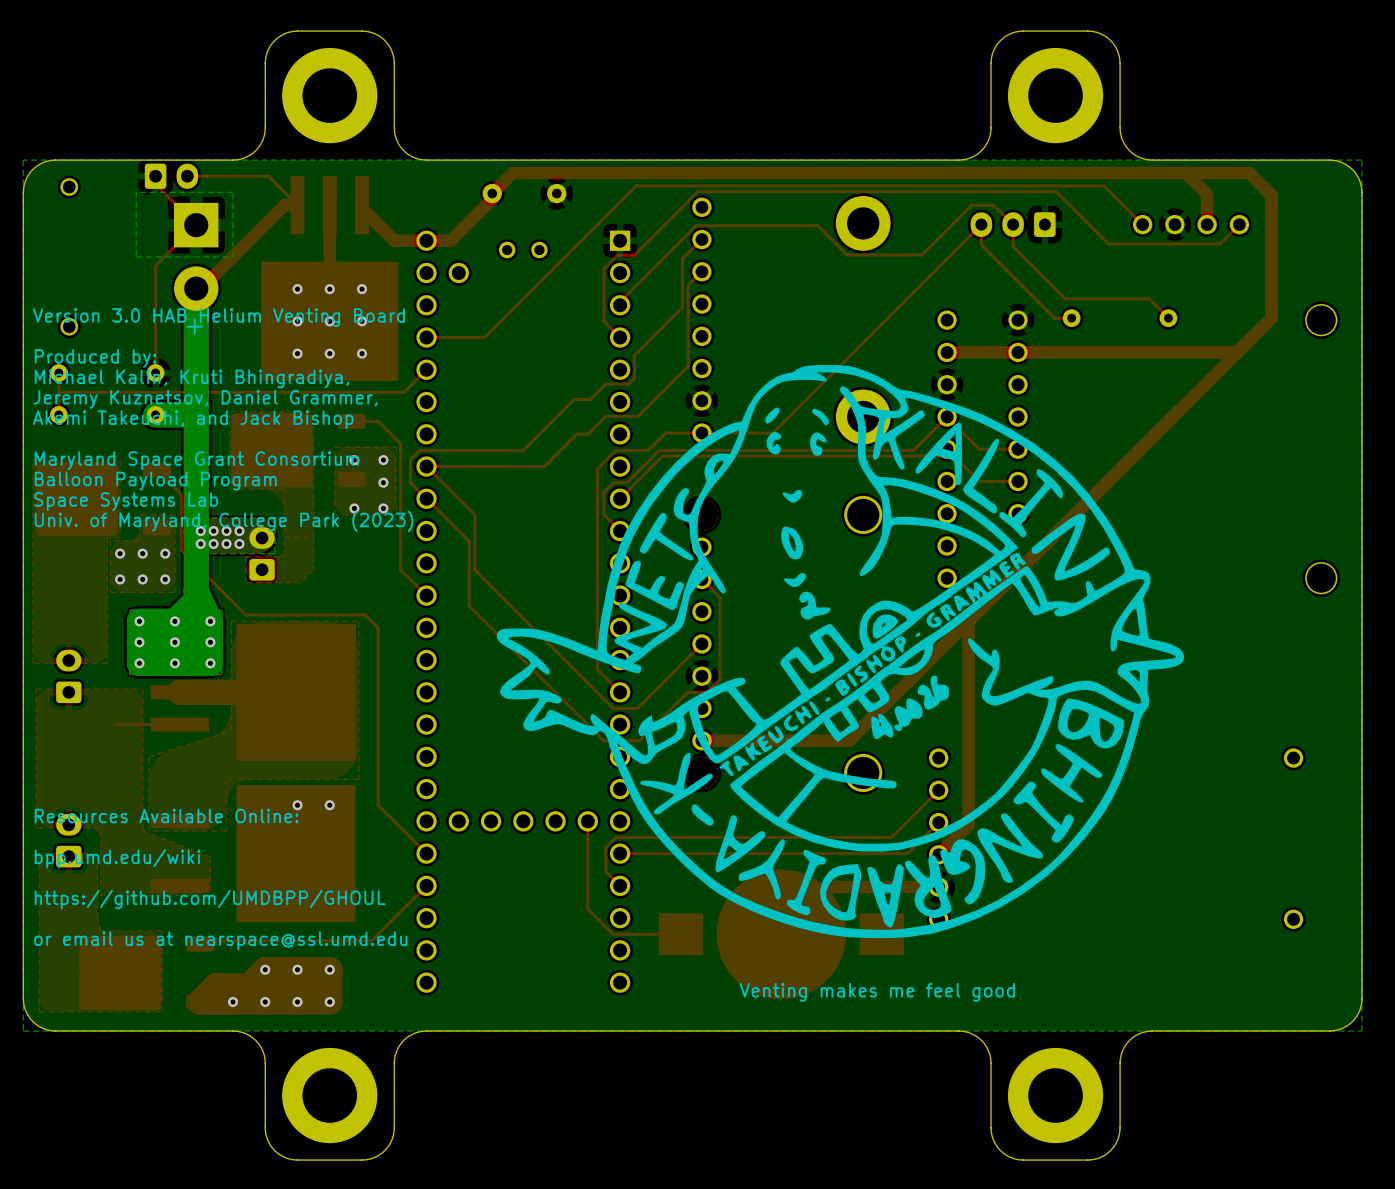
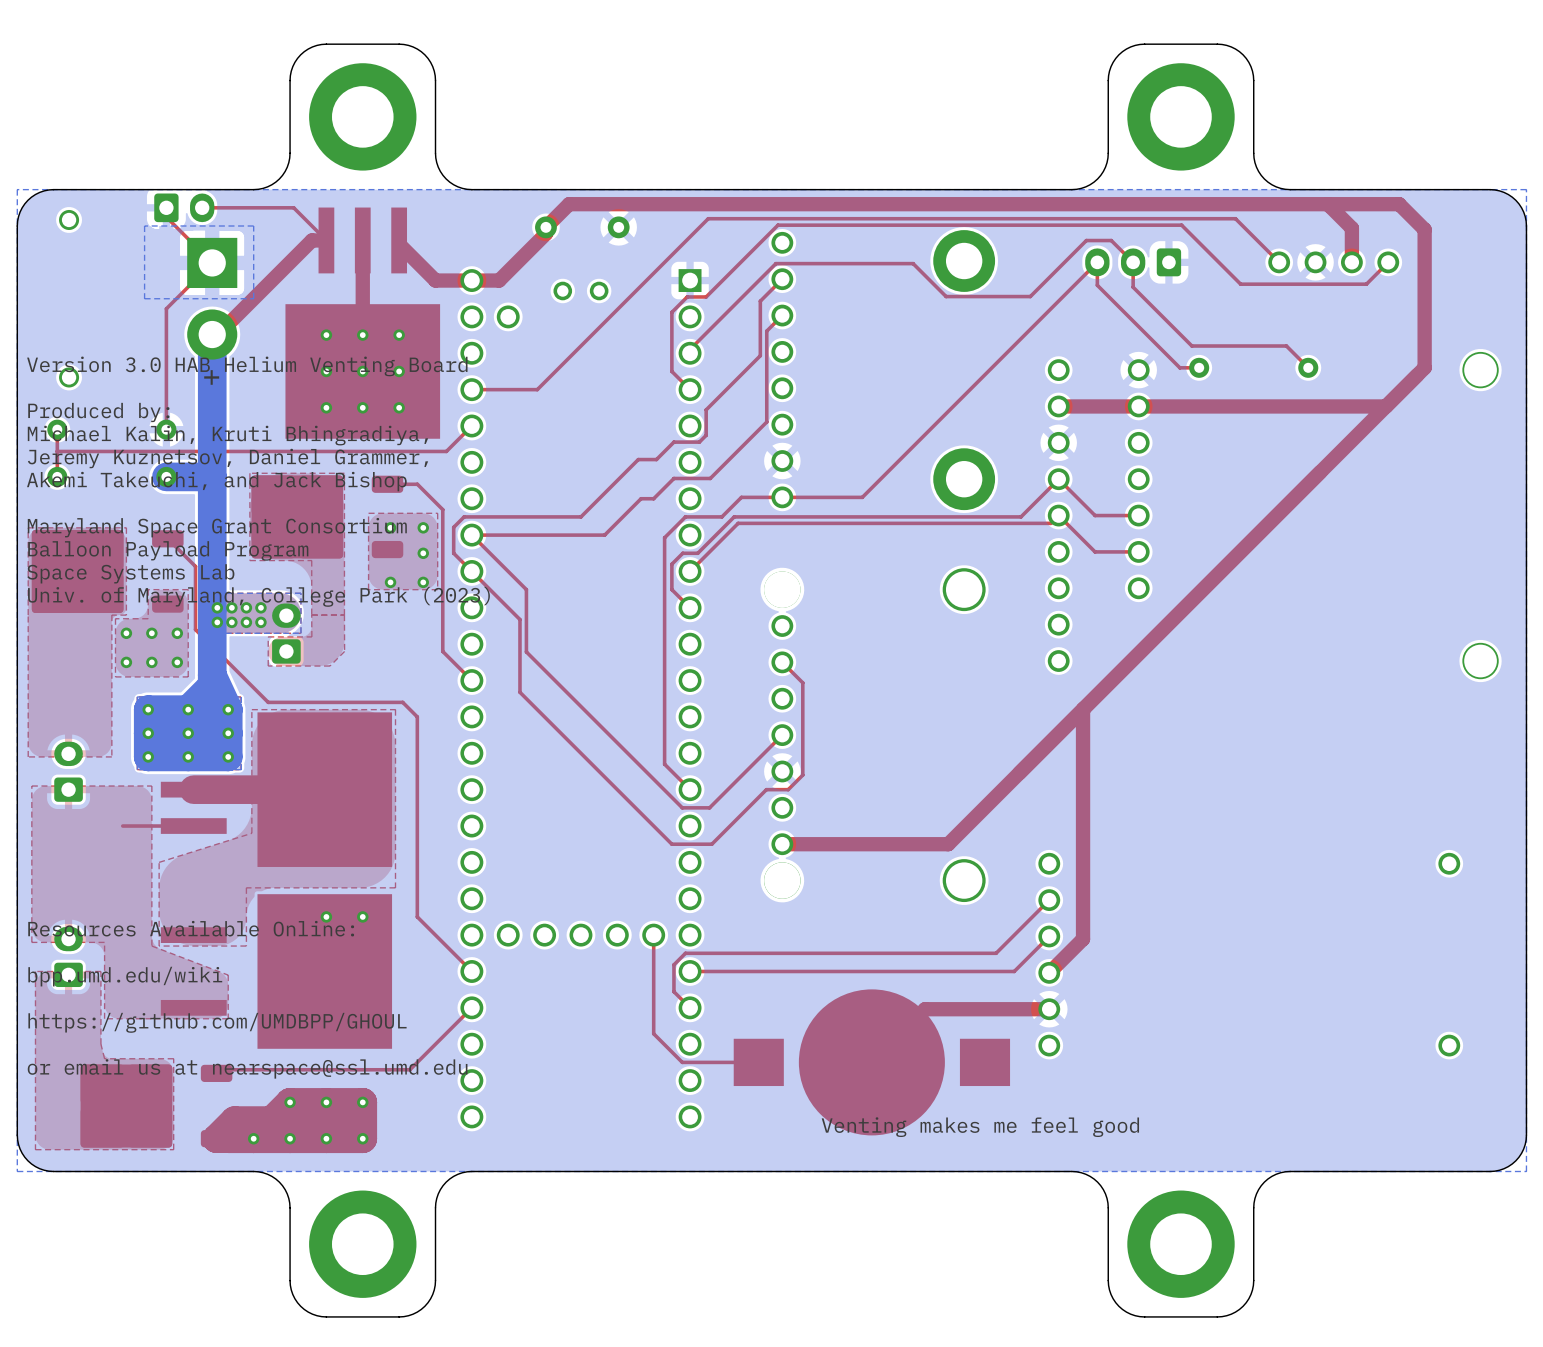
drawing: [496, 365, 1185, 939] -> none

